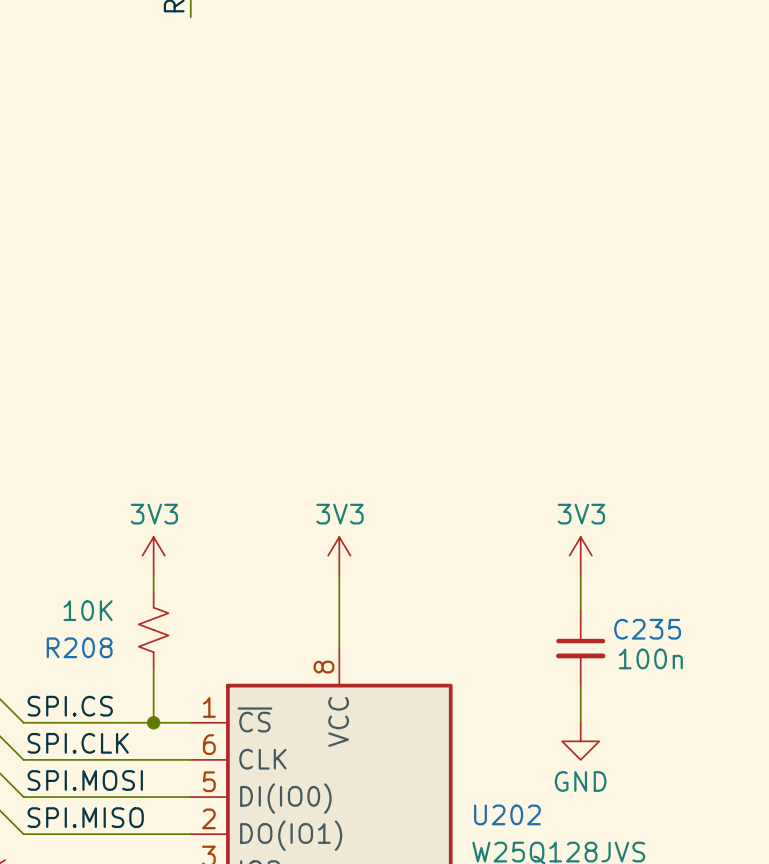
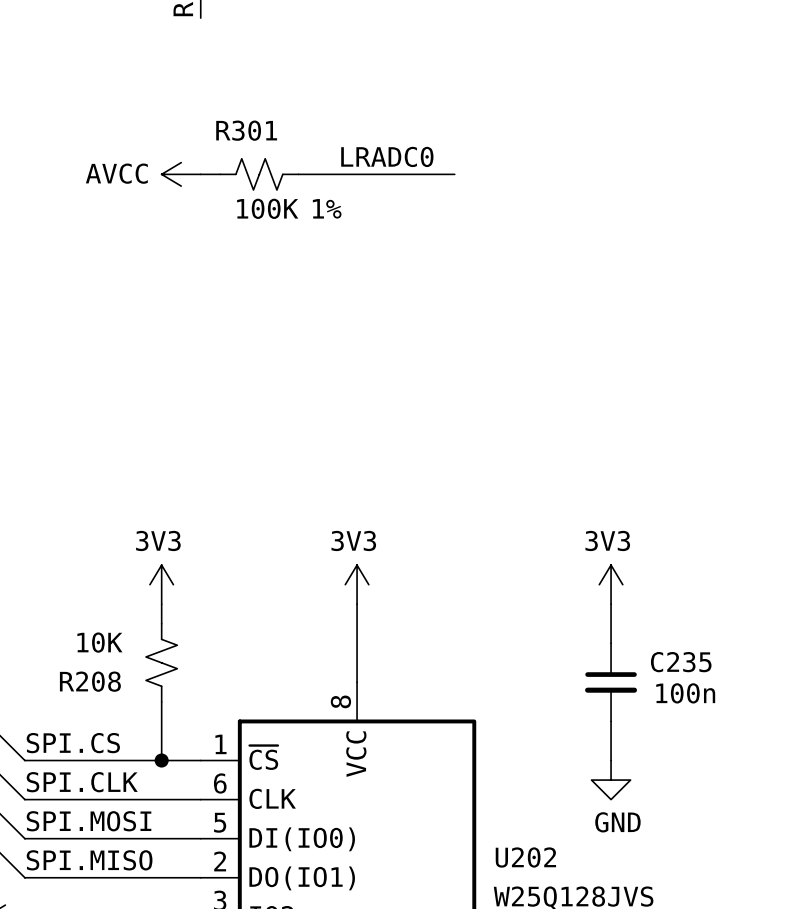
label: none -> LRADC0 (387, 156)
power symbol: none -> AVCC (181, 174)
wire: none -> (200, 174) (220, 174)
R301: none -> 100K (259, 174)
wire: none -> (298, 174) (454, 174)

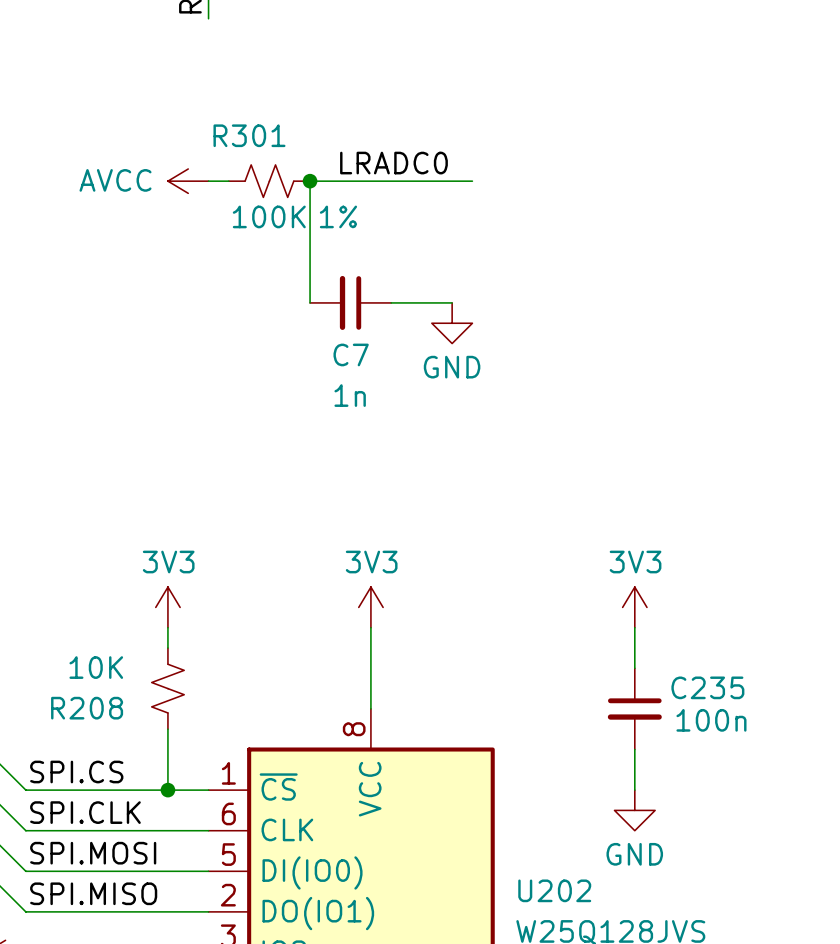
wire: none -> (310, 181) (310, 302)
junction: none -> (310, 181)
C7: none -> 1n (350, 302)
wire: none -> (391, 302) (452, 302)
power symbol: none -> GND (452, 323)

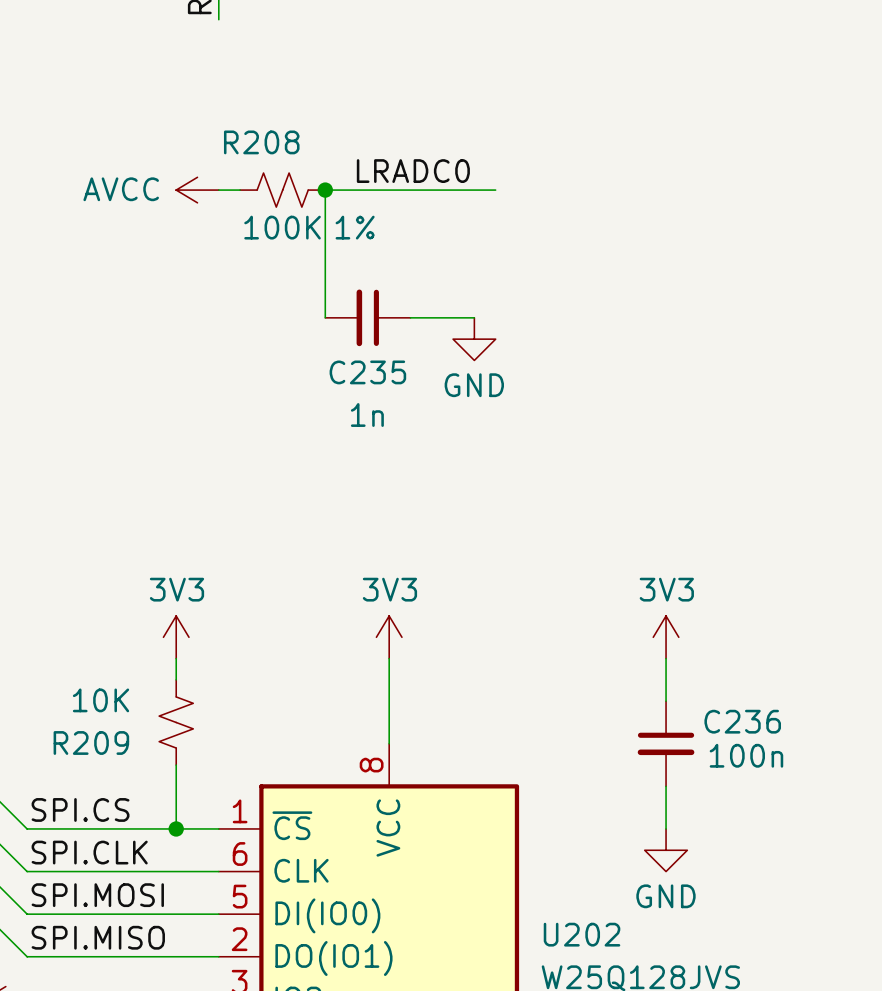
R301 name: R301 (249, 135) -> R208 (261, 142)
C7 name: C7 (351, 354) -> C235 (367, 372)
C235 name: C235 (707, 687) -> C236 (742, 721)
R208 name: R208 (87, 708) -> R209 (91, 742)

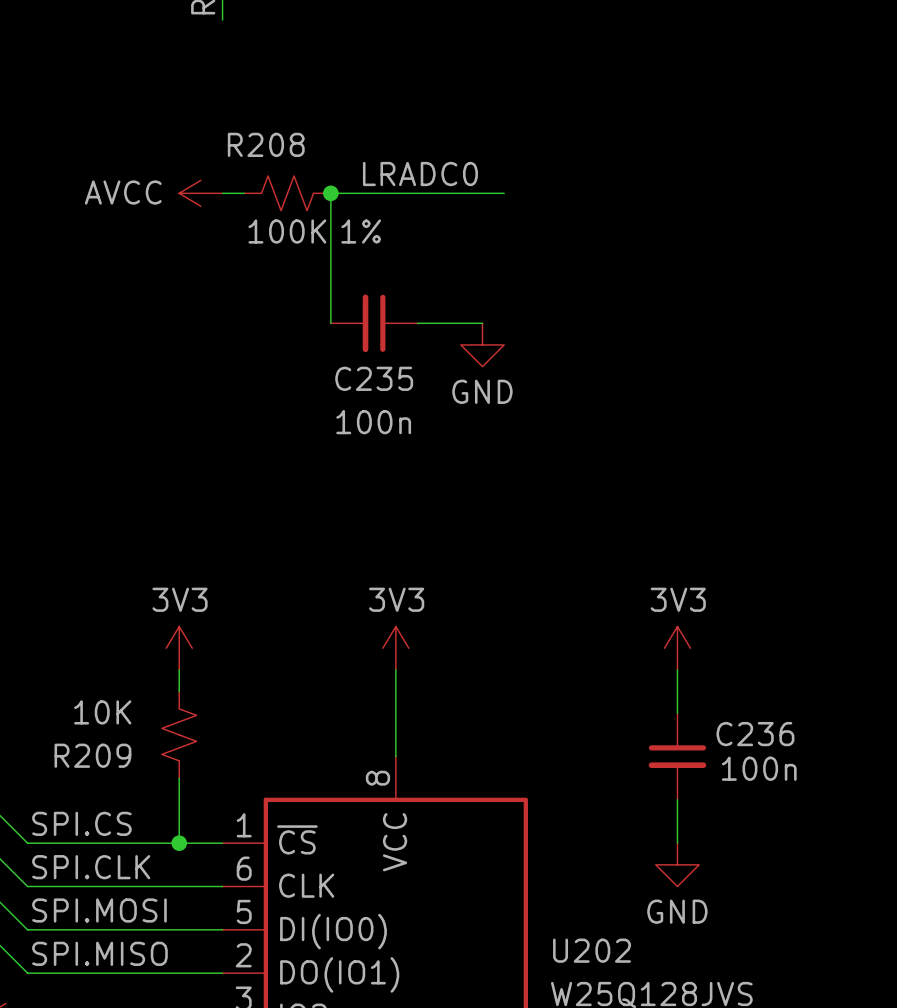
C235 value: 1n (367, 415) -> 100n (373, 422)

